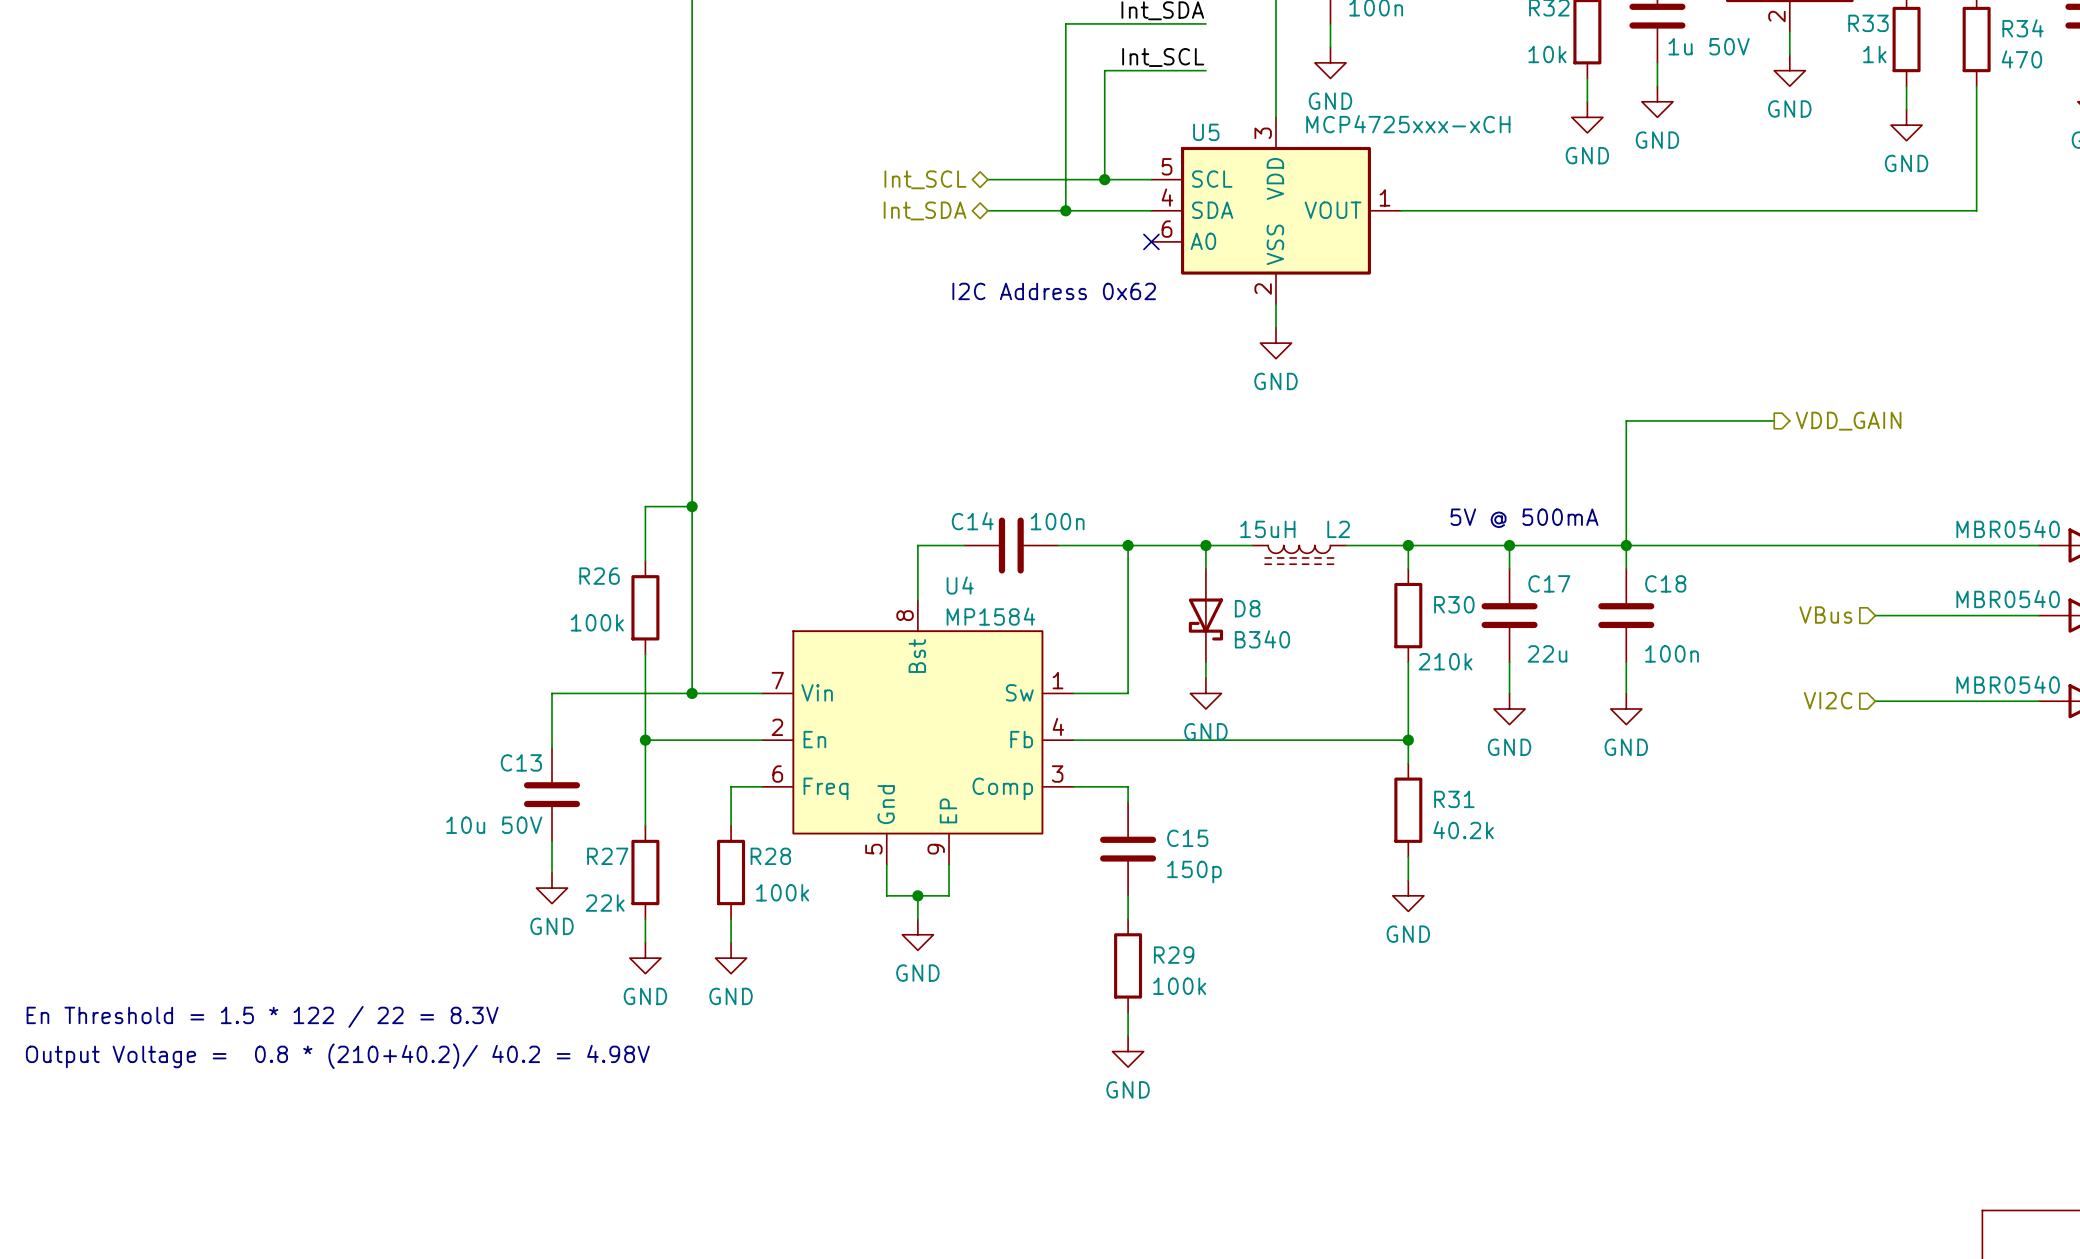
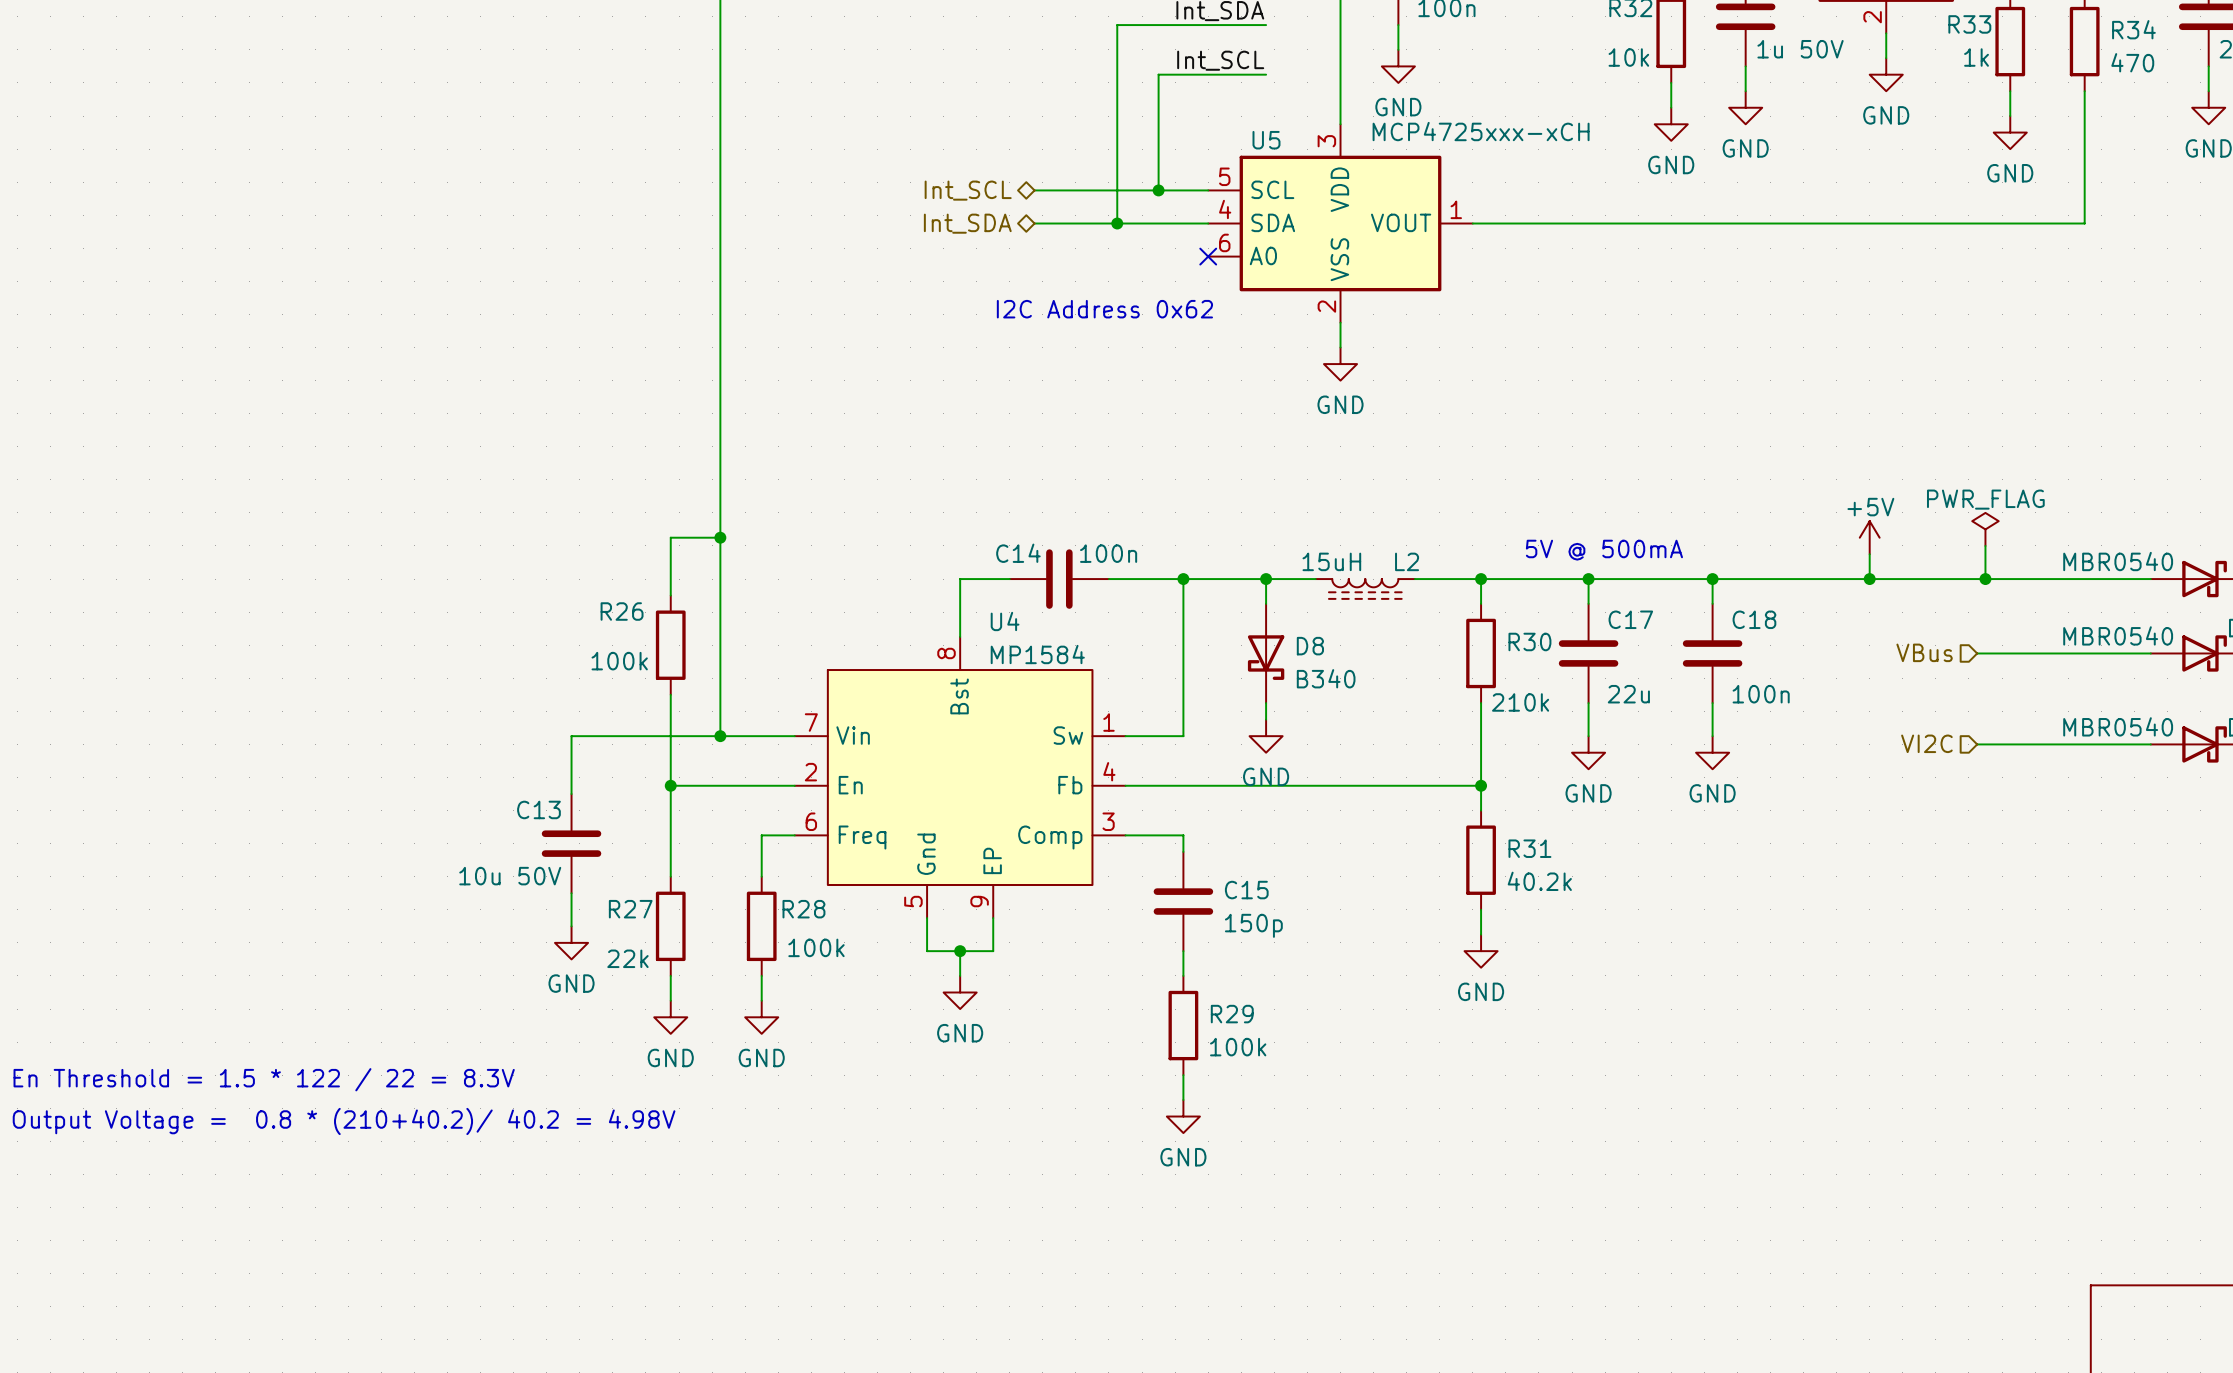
wire: (1774, 420) (1626, 420) (1626, 545) -> none
hierarchical label: VDD_GAIN (1848, 421) -> none
power symbol: none -> PWR_FLAG (1985, 529)
power symbol: none -> +5V (1869, 537)
wire: none -> (1985, 545) (1985, 579)
wire: none -> (1869, 554) (1869, 579)
junction: none -> (1869, 579)
junction: none -> (1985, 579)

